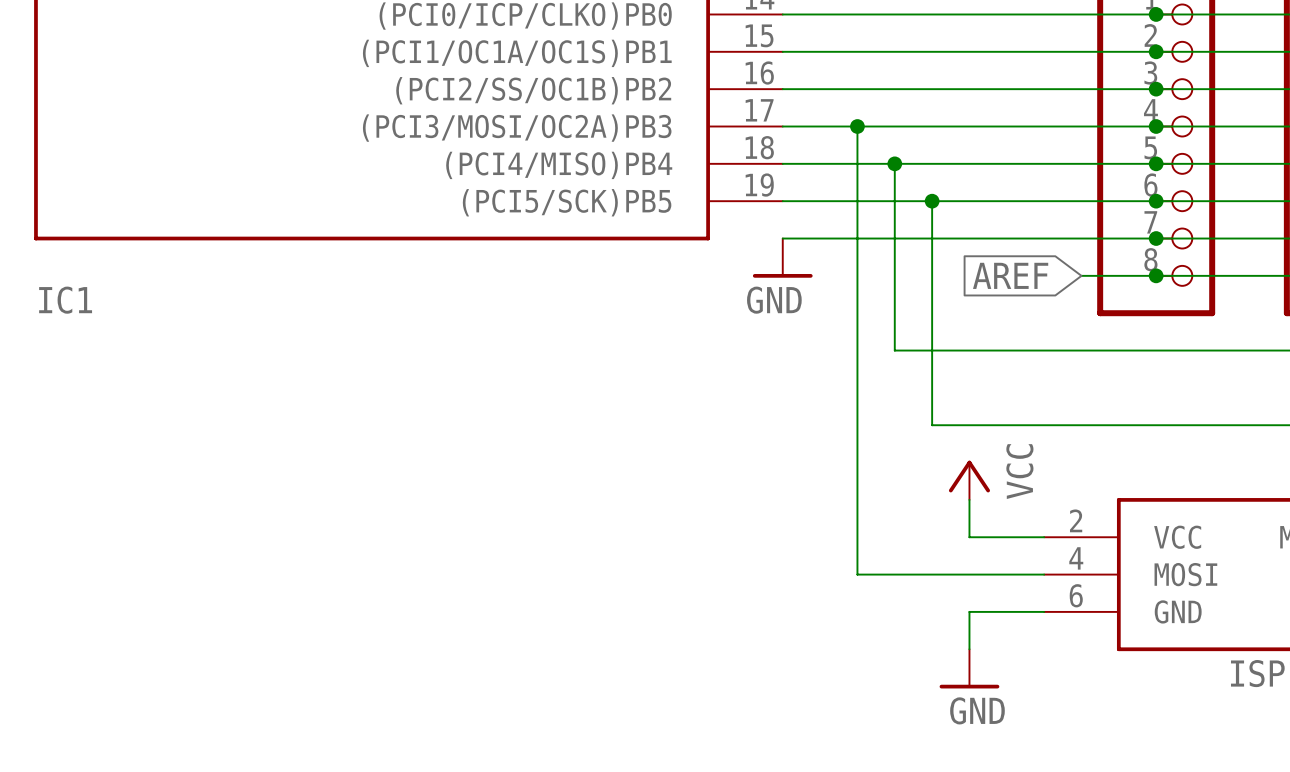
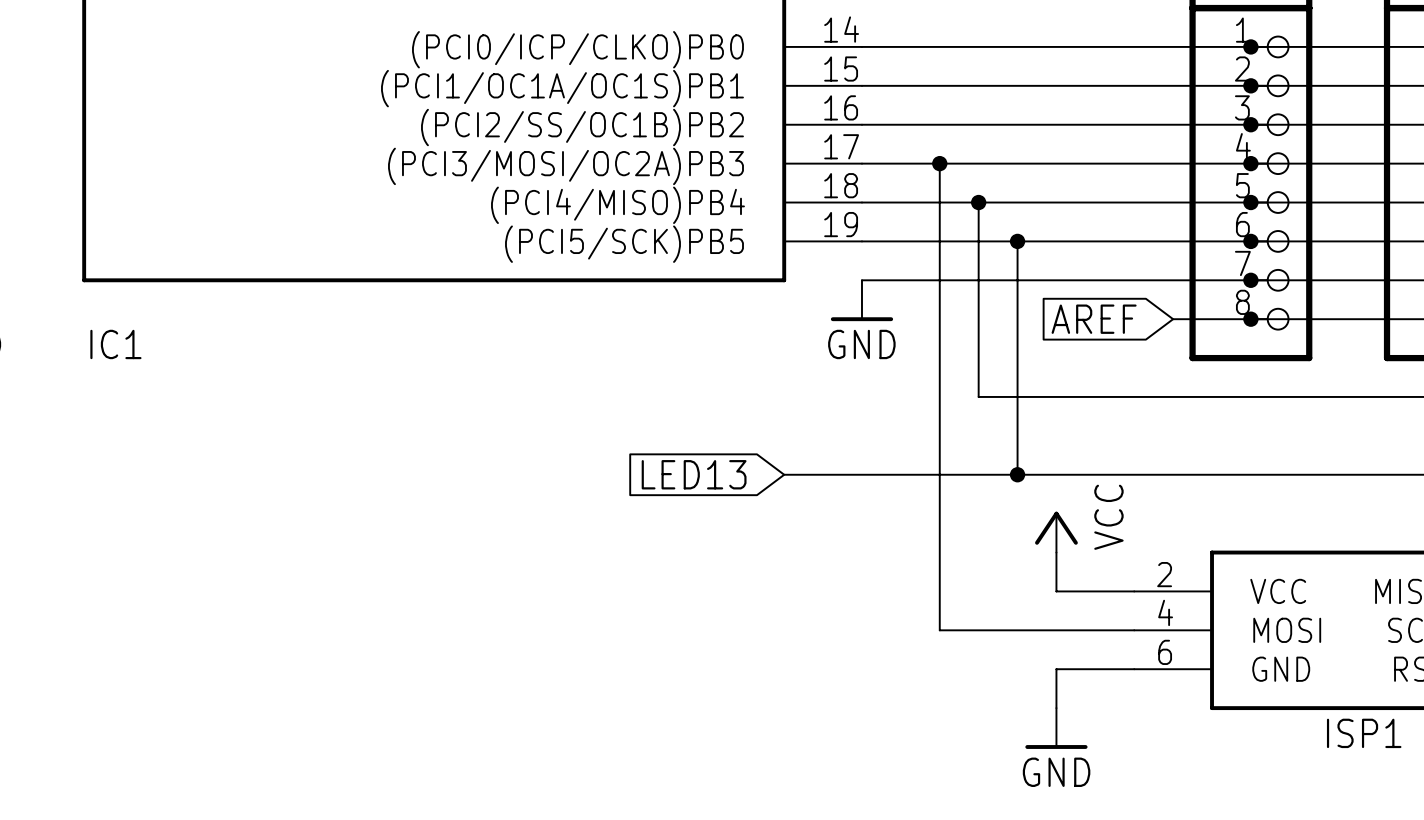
global label: none -> LED13 (694, 474)
wire: none -> (784, 474) (1017, 474)
junction: none -> (1017, 474)

